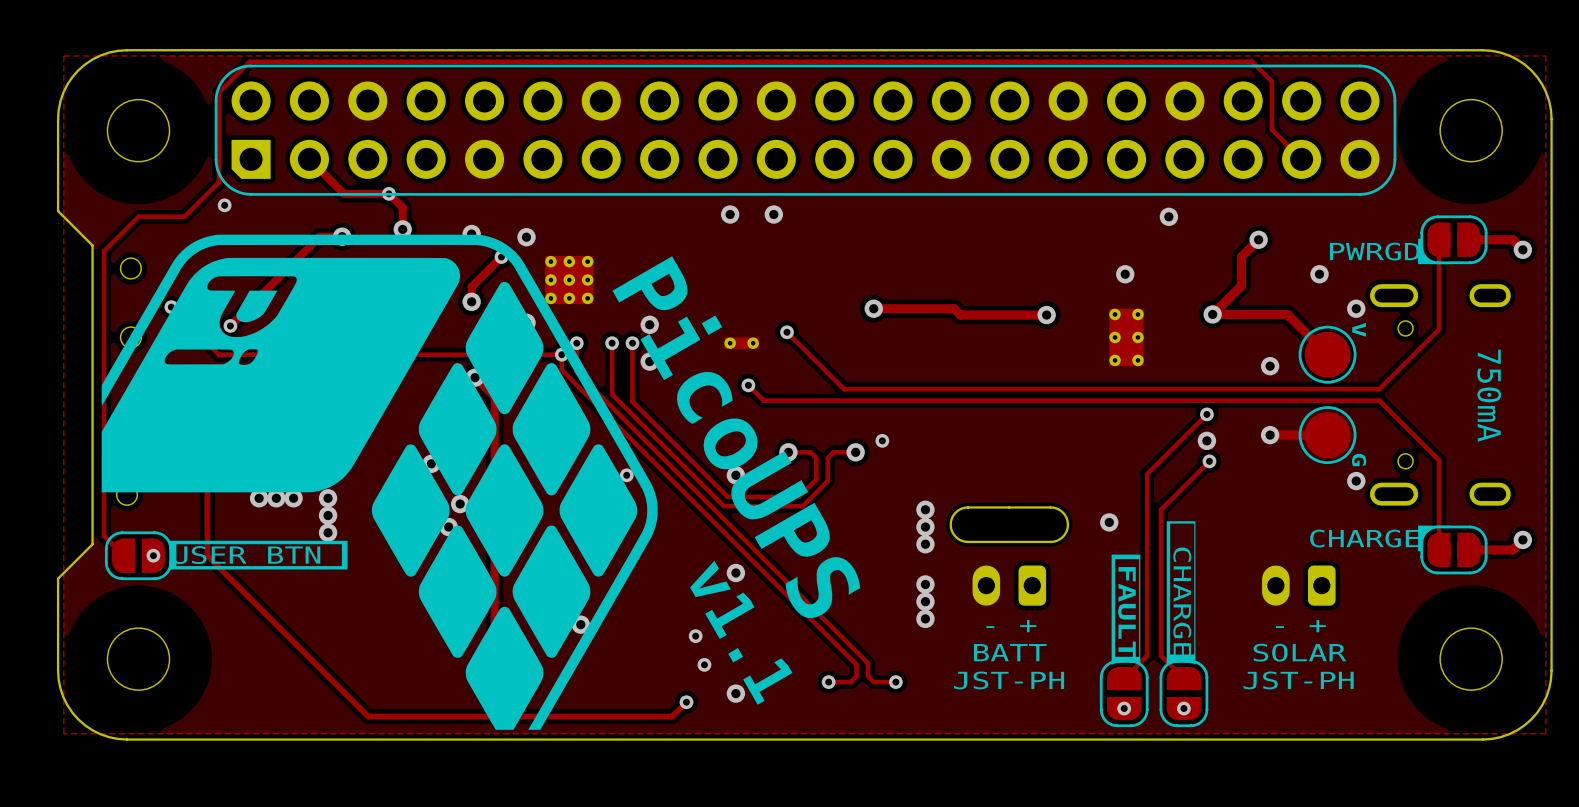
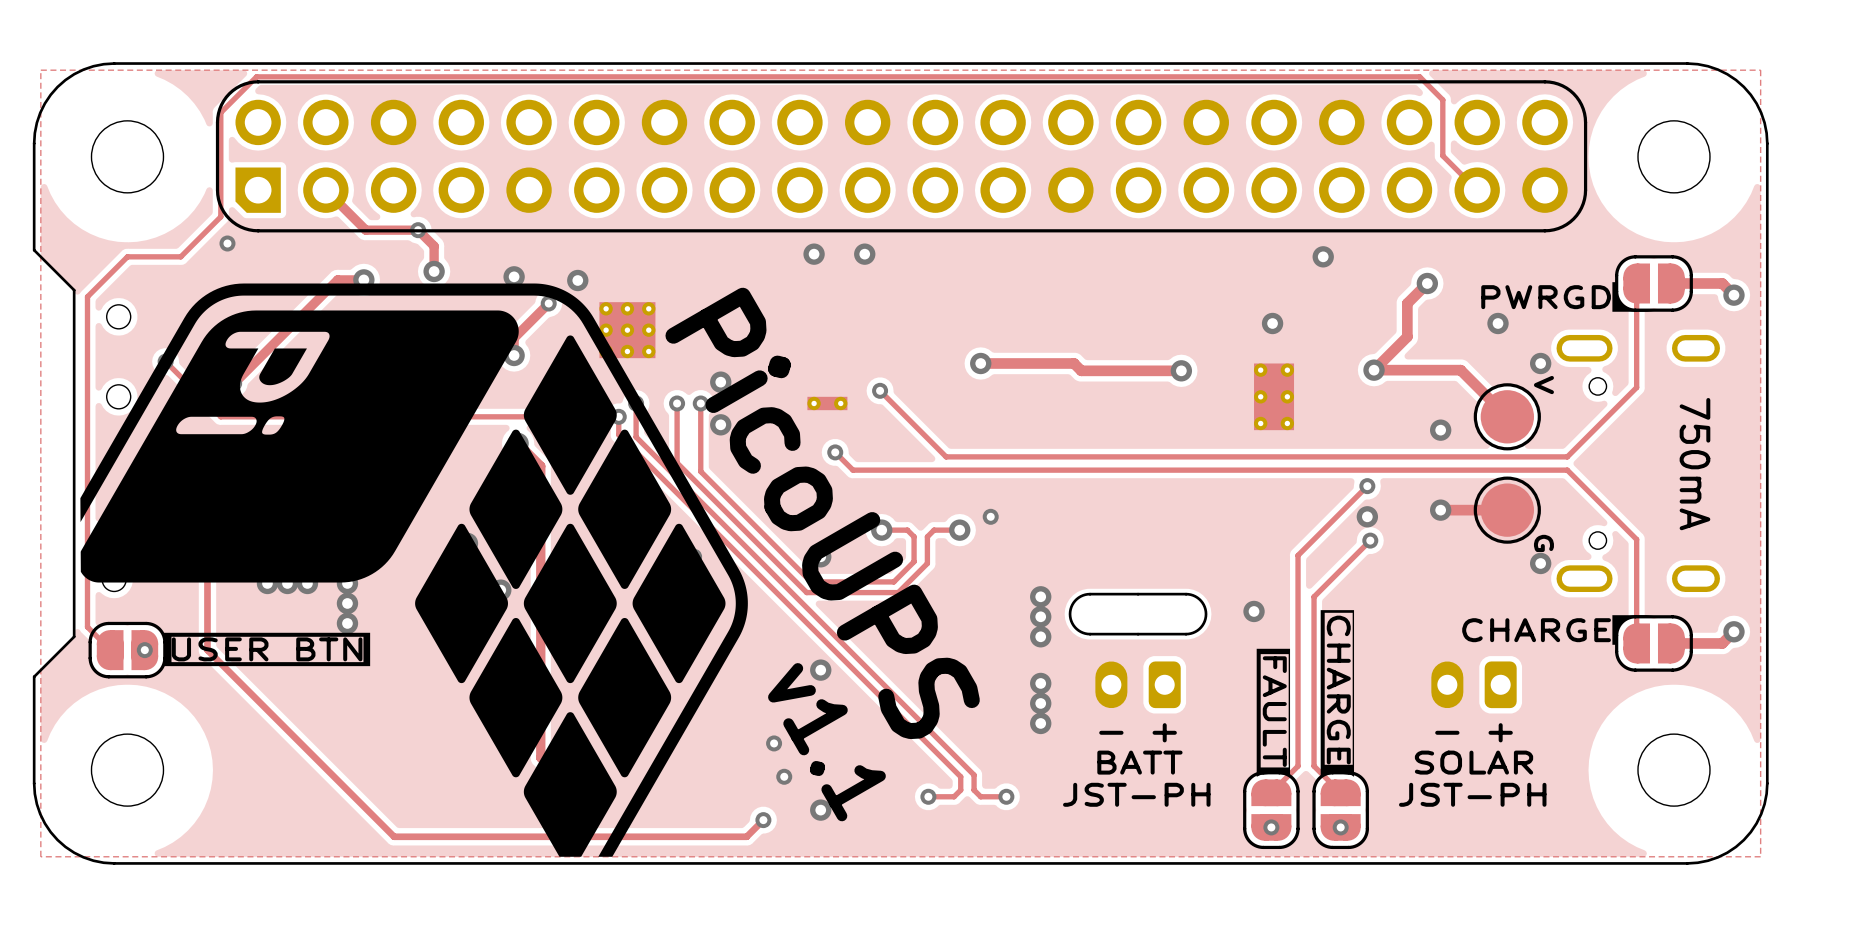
drawing shape: [101, 234, 658, 730] -> [80, 283, 748, 857]
drawing: [371, 281, 638, 730] -> none

